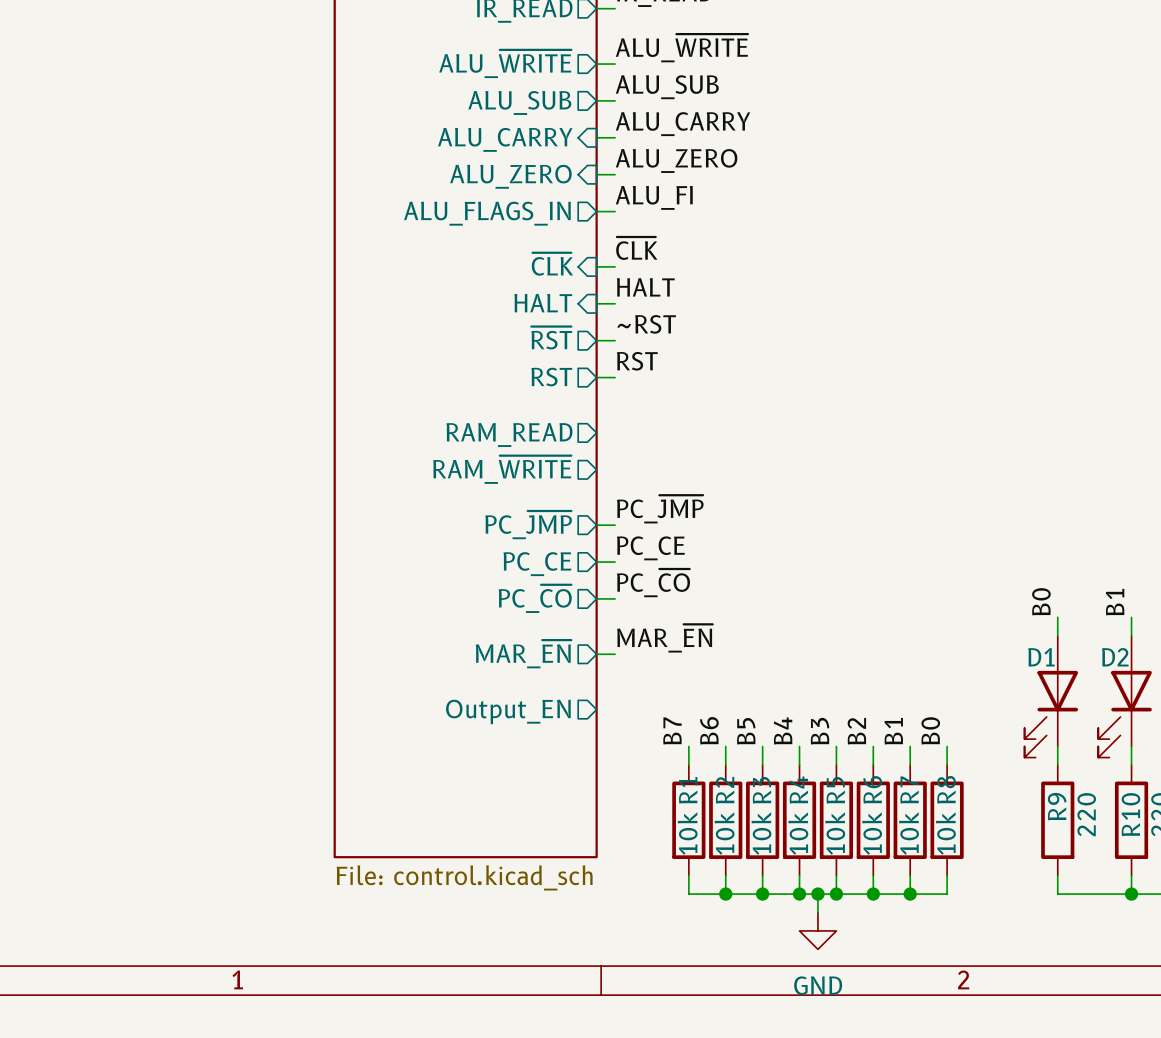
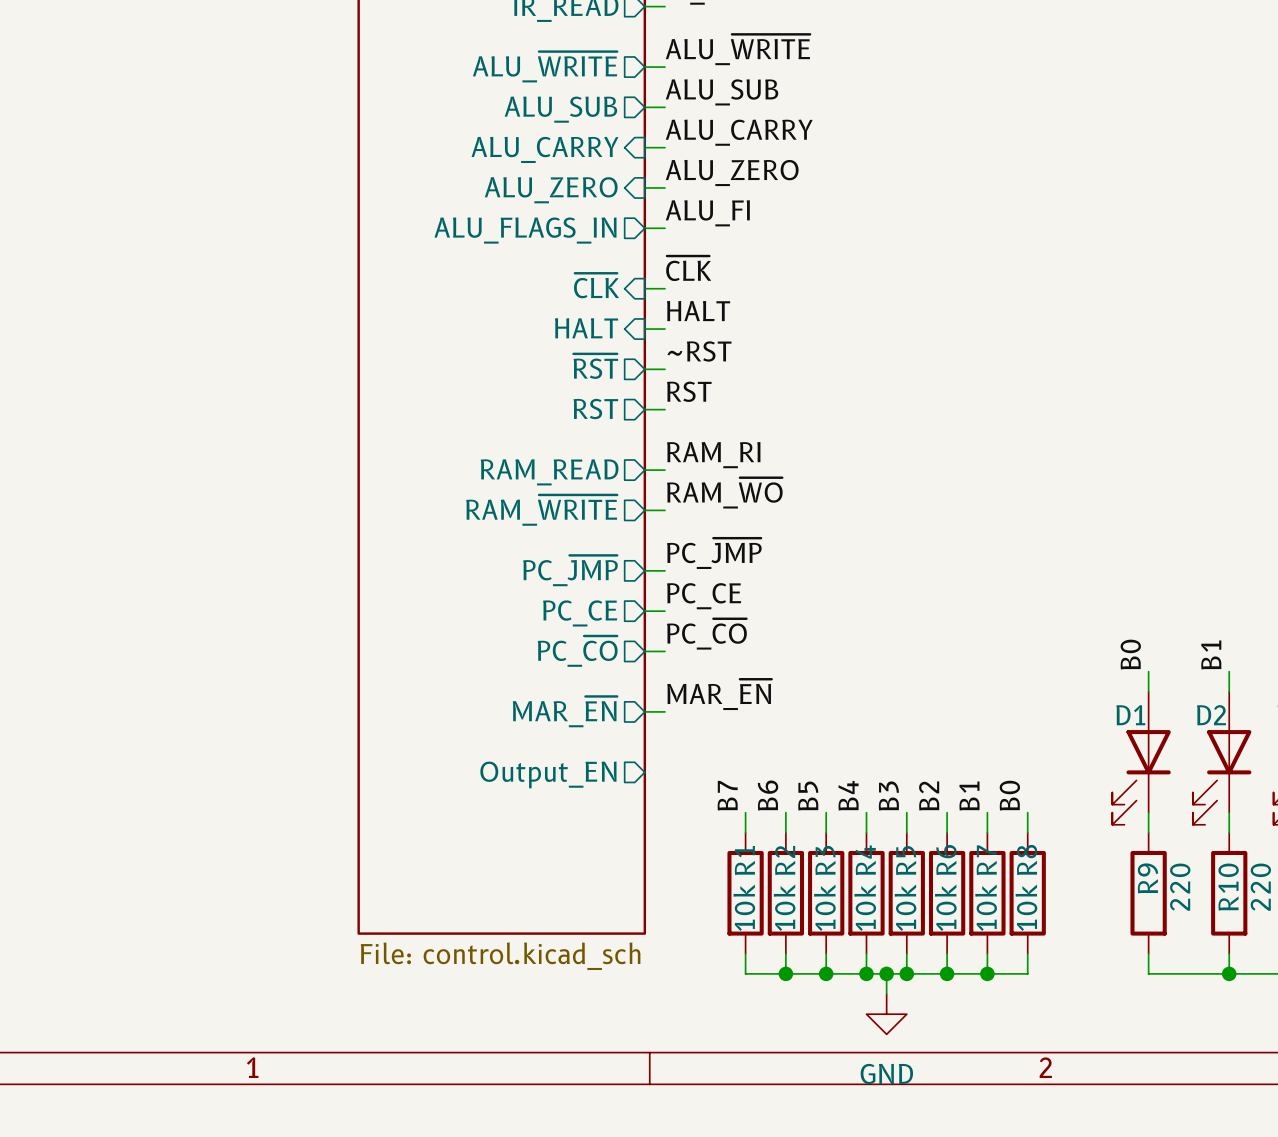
label: none -> RAM_RI (713, 455)
wire: none -> (644, 470) (664, 470)
label: none -> RAM_~{WO} (724, 493)
wire: none -> (644, 510) (664, 510)

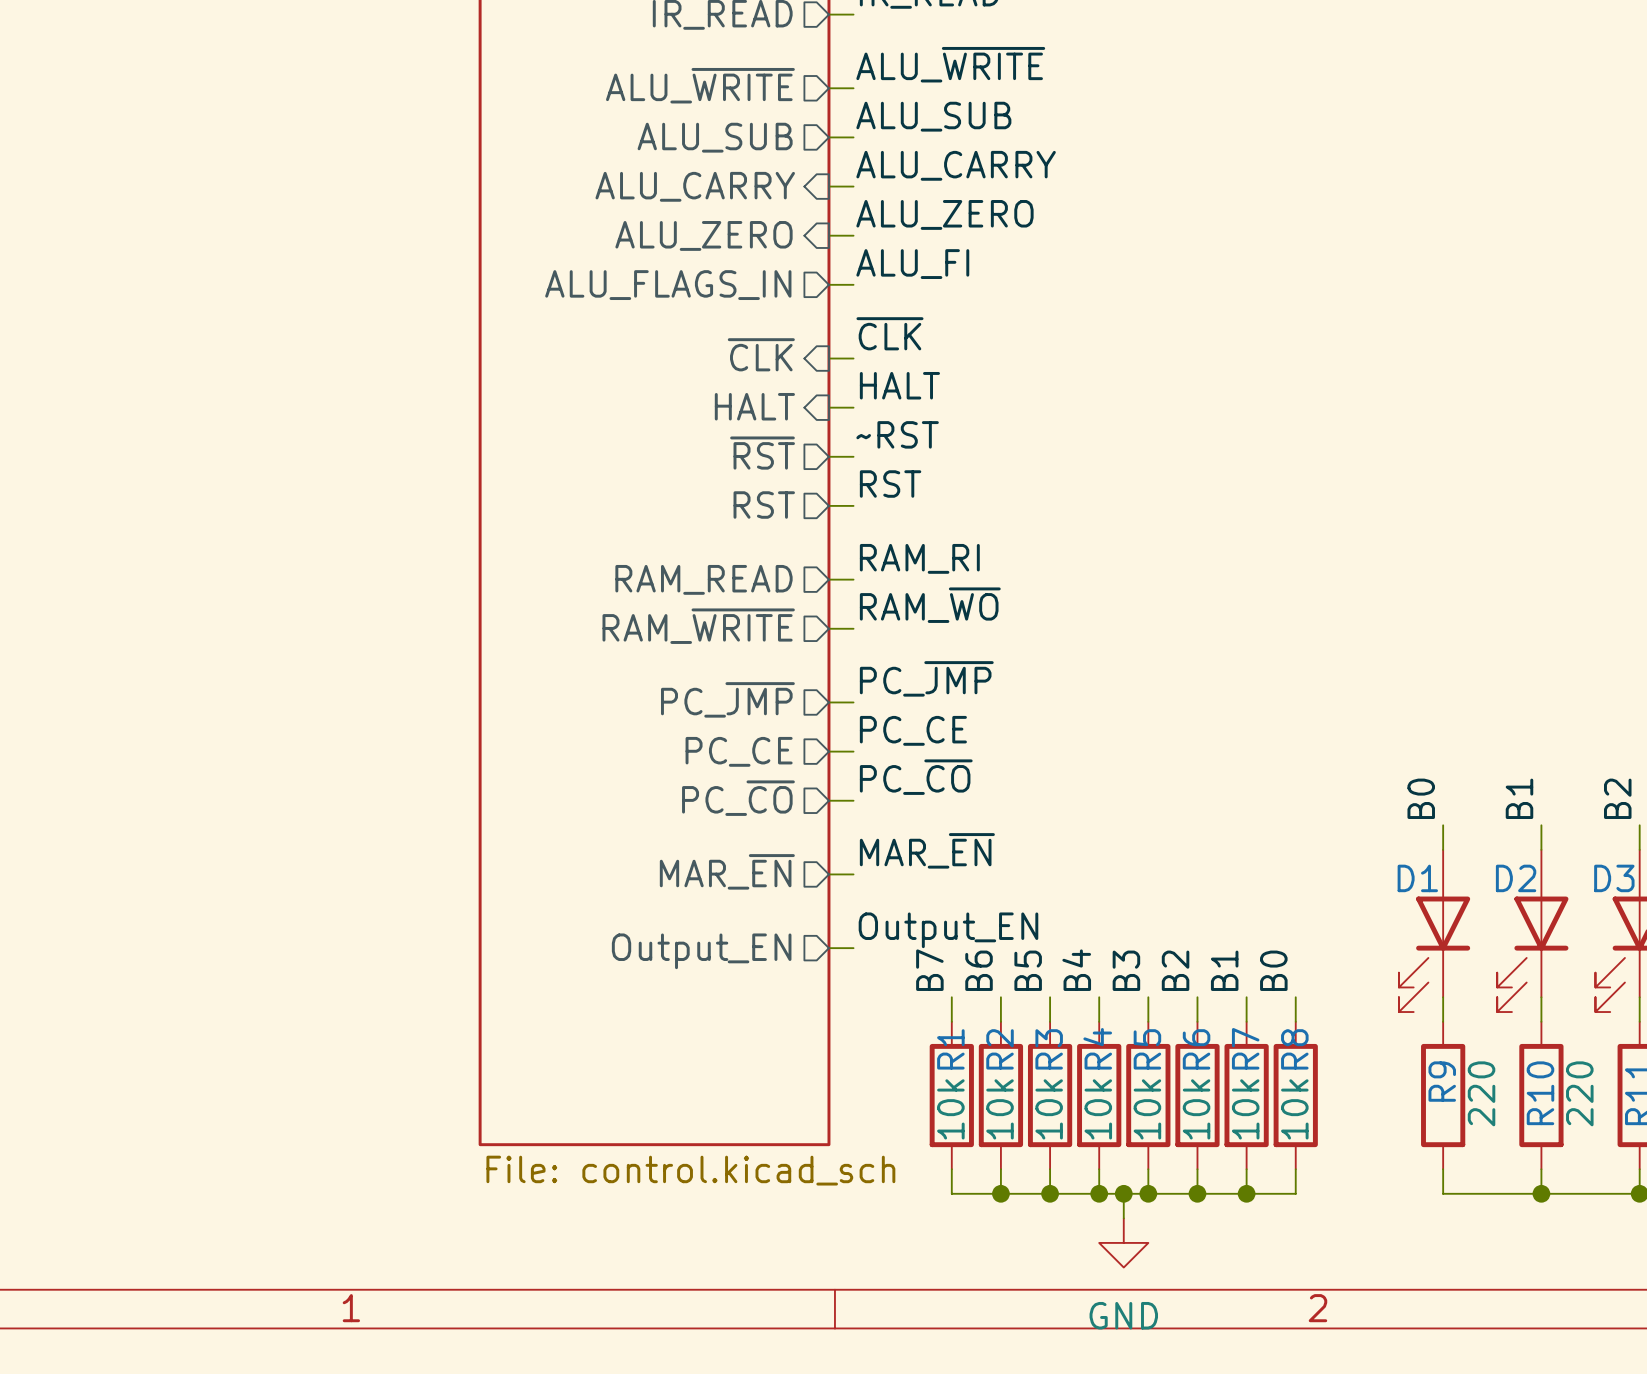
label: none -> Output_EN (948, 930)
wire: none -> (828, 948) (853, 948)

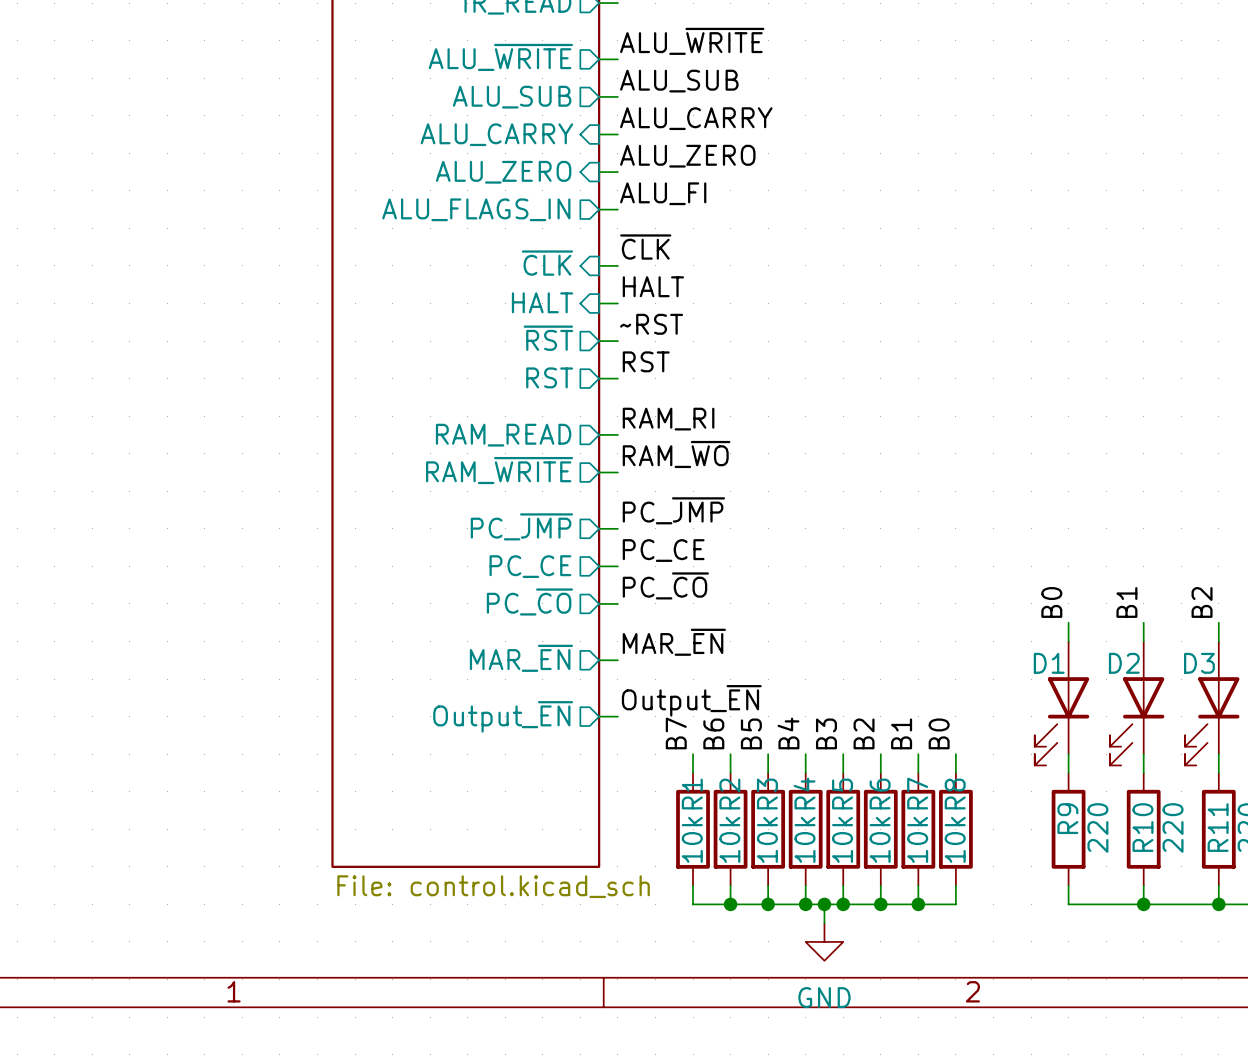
label: Output_EN (948, 930) -> Output_~{EN} (691, 700)
sheet pin: Output_EN (701, 951) -> Output_~{EN} (503, 716)

